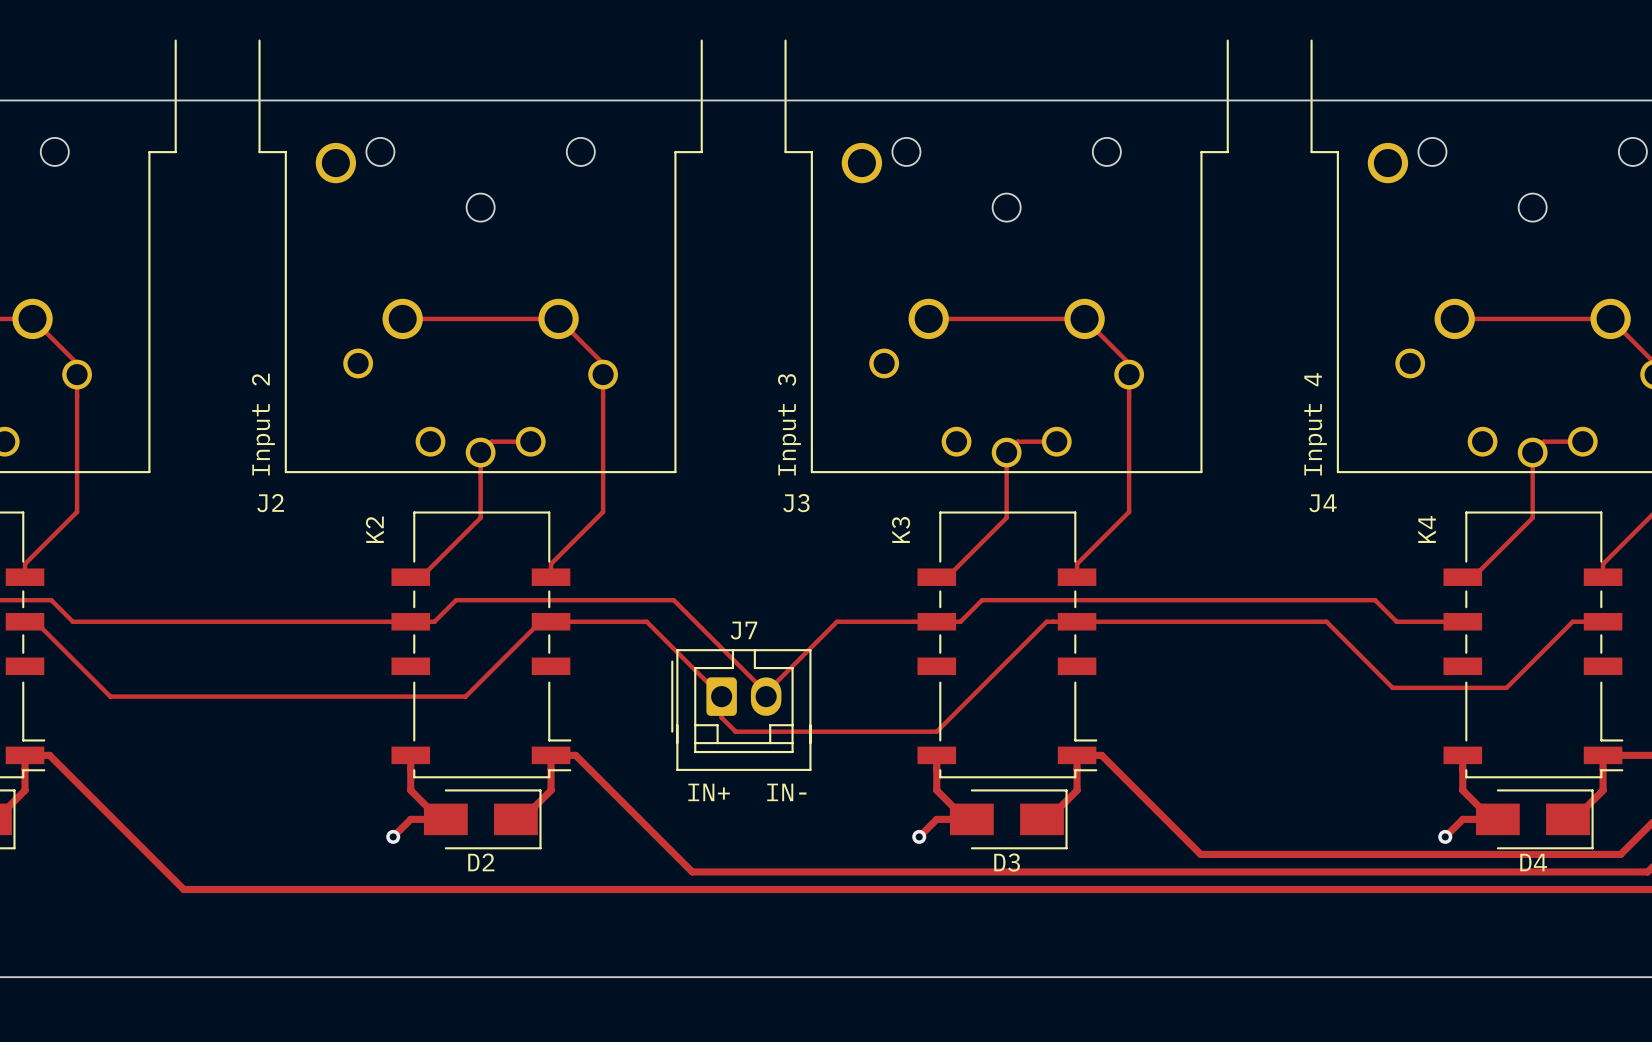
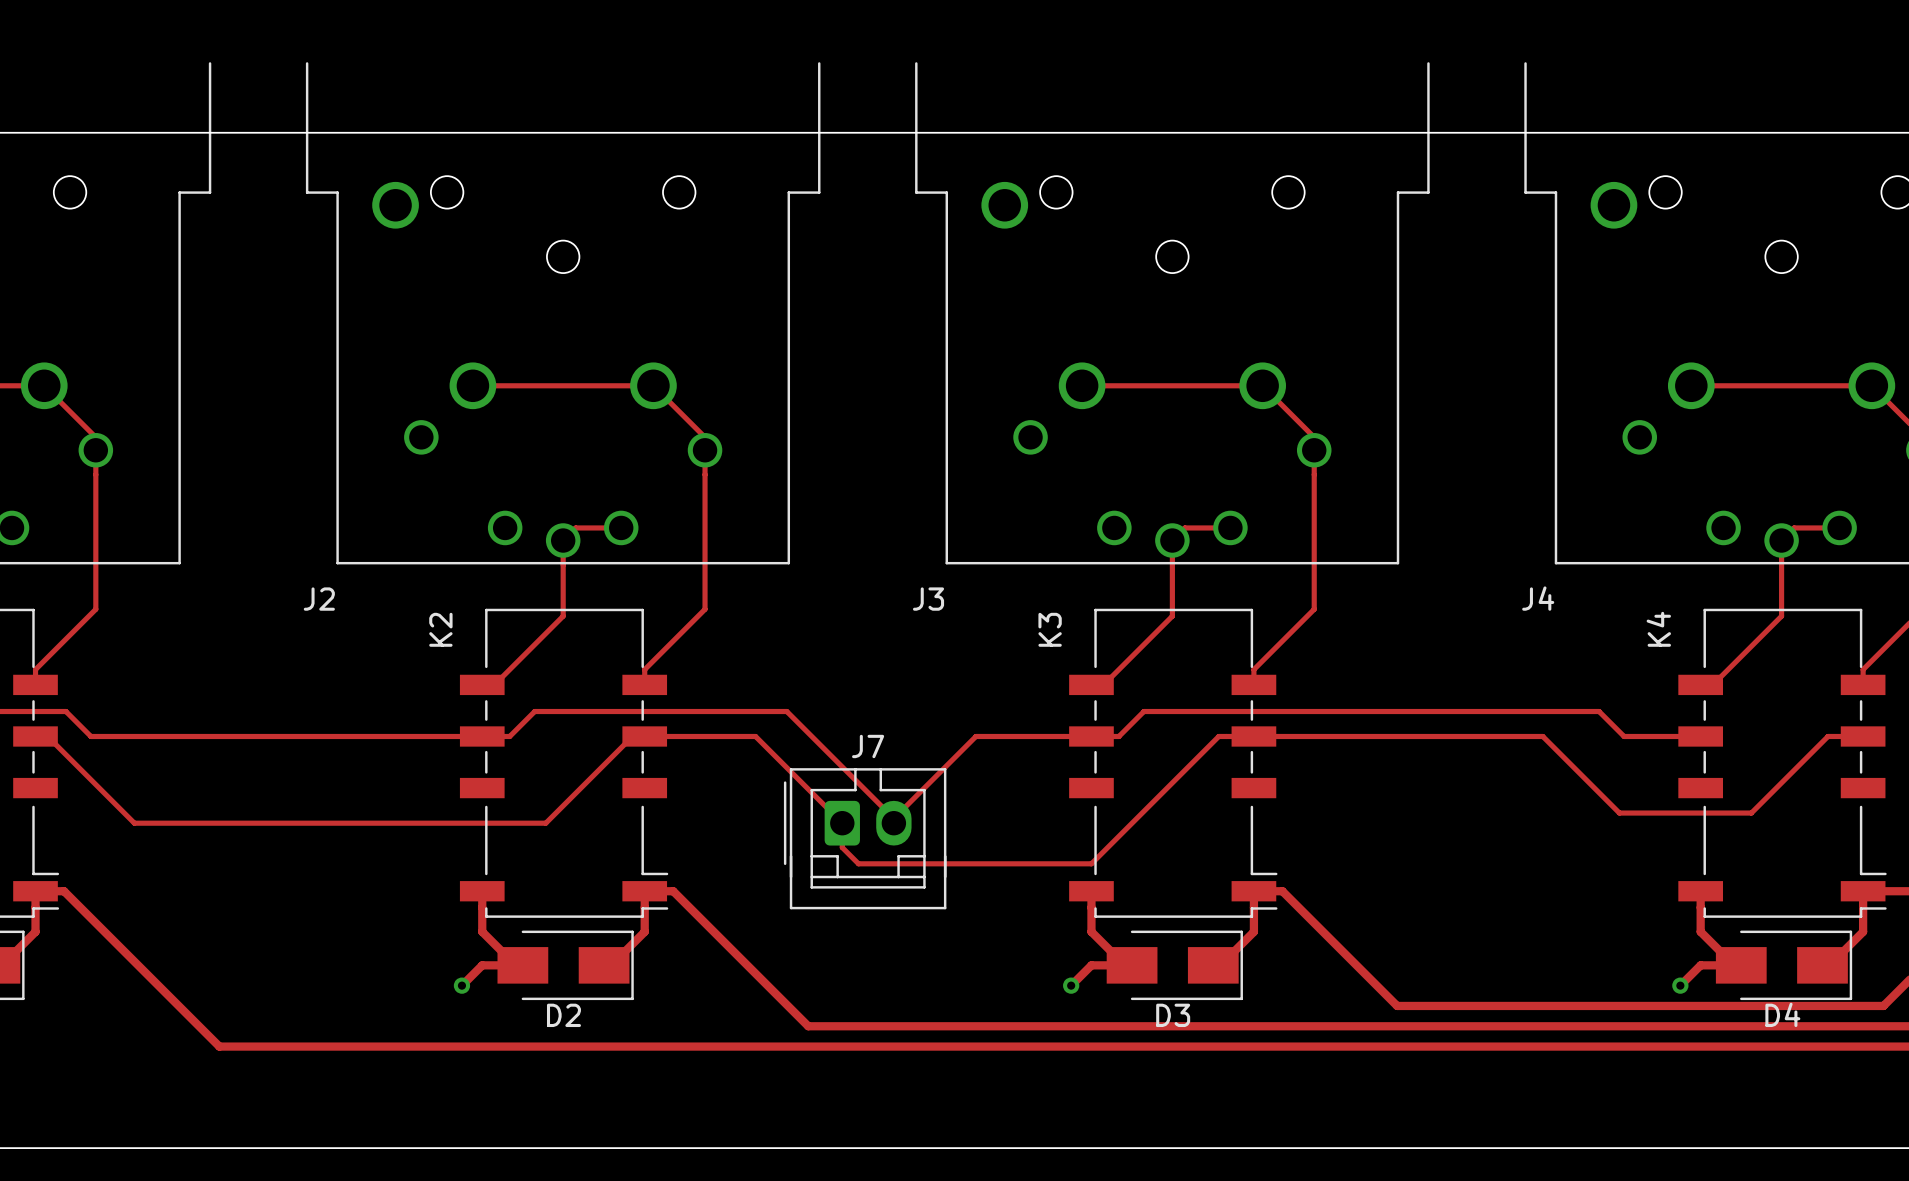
J2 text: Input 2 (263, 424) -> none
J3 text: Input 3 (789, 424) -> none
J4 text: Input 4 (1315, 424) -> none
J7 text: IN+ (709, 792) -> none
J7 text: IN- (786, 792) -> none

